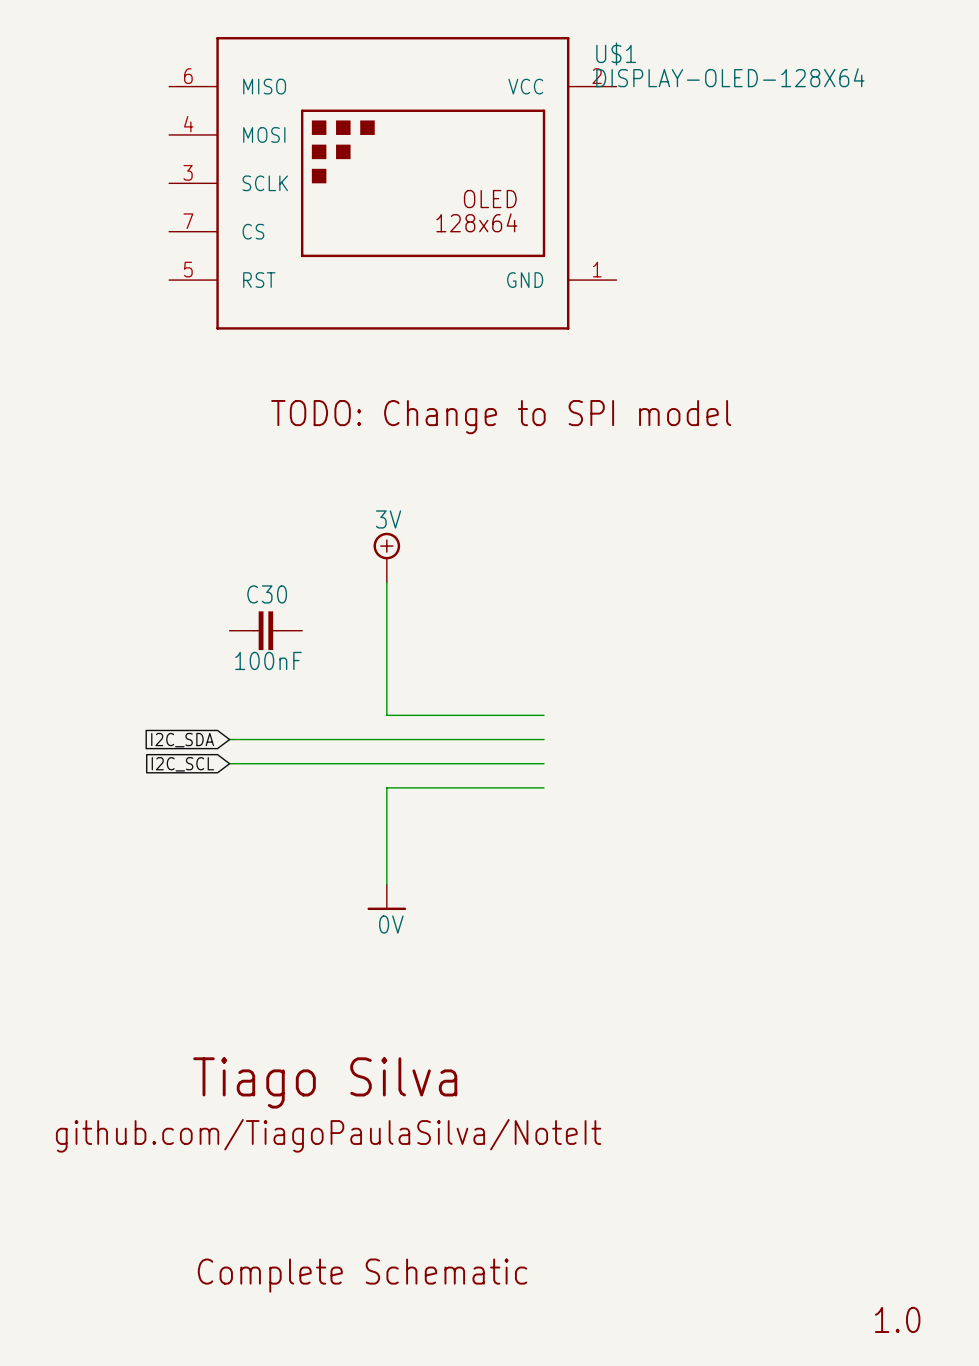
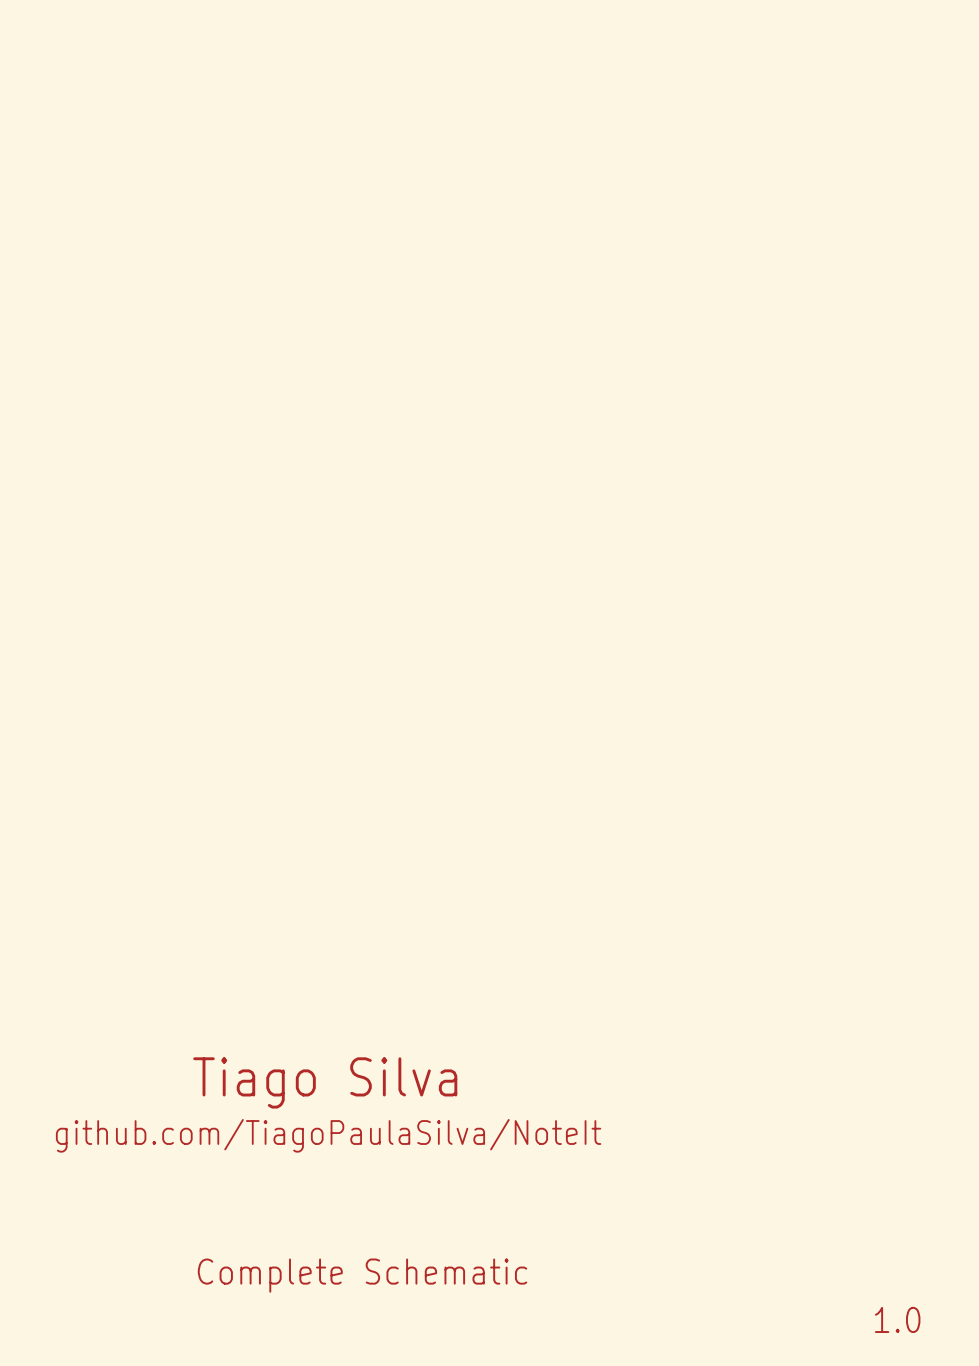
U$1: DISPLAY-OLED-128X64 (392, 183) -> none
text: TODO: Change to SPI model (501, 417) -> none
power symbol: 3V (386, 557) -> none
wire: (386, 582) (386, 715) (544, 715) -> none
C30: 100nF (265, 630) -> none
wire: (229, 739) (544, 739) -> none
global label: I2C_SDA (182, 740) -> none
wire: (229, 763) (544, 763) -> none
global label: I2C_SCL (182, 764) -> none
wire: (544, 787) (386, 787) (386, 884) -> none
power symbol: 0V (386, 897) -> none

